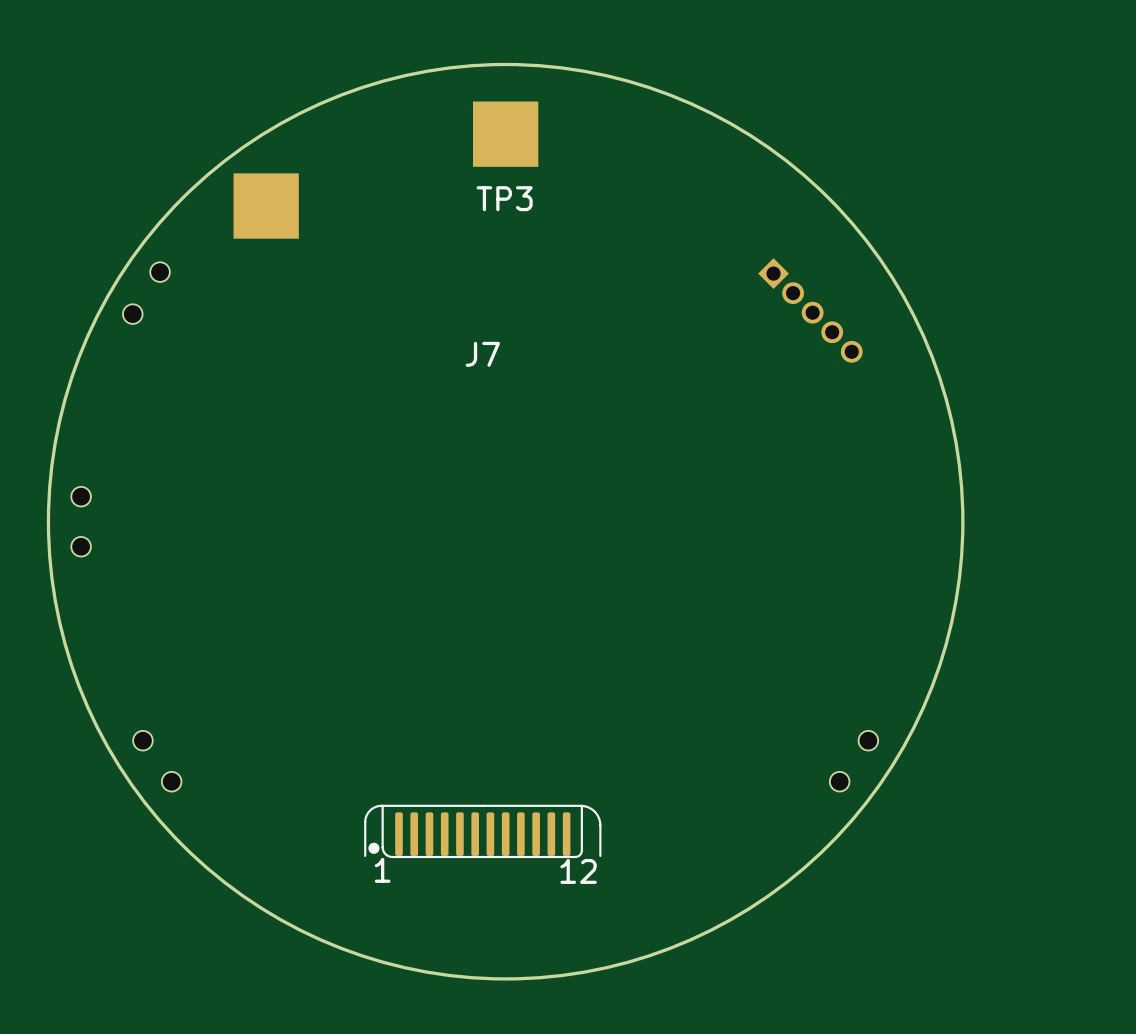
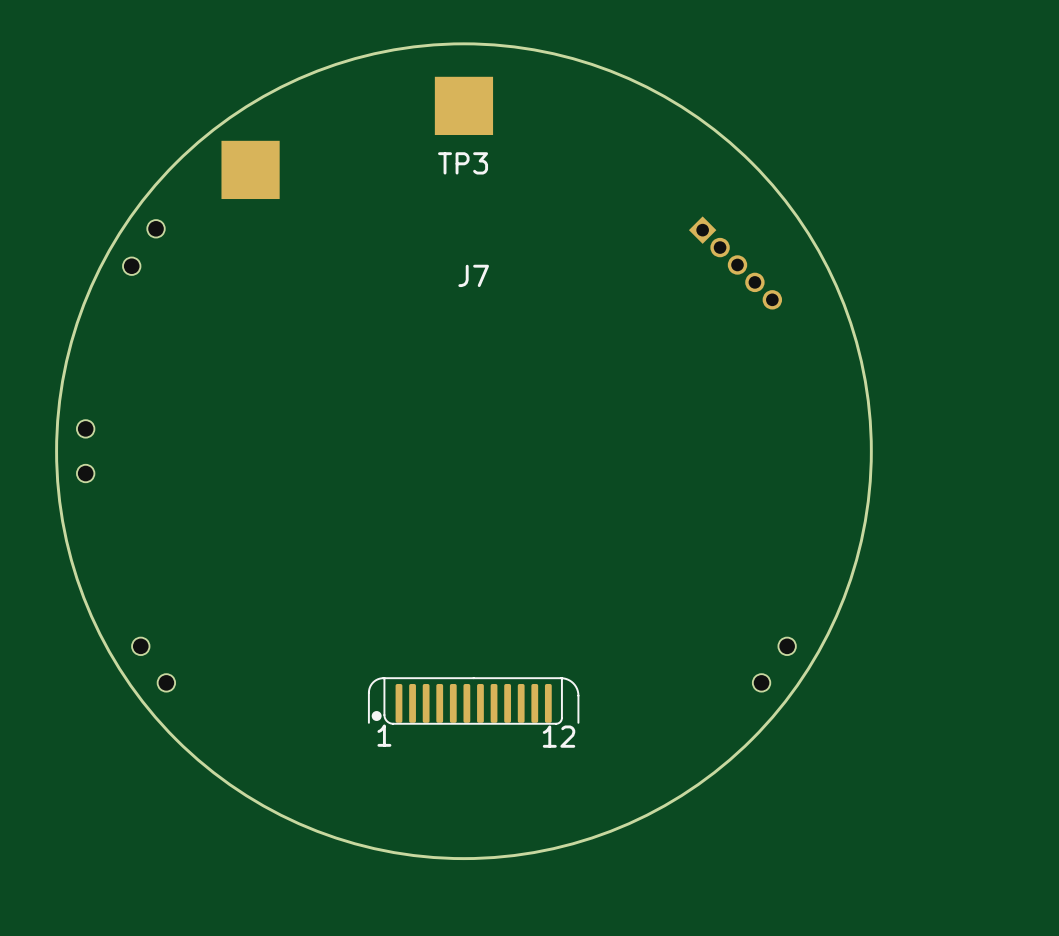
J7 position: (482, 831) -> (473, 700)

